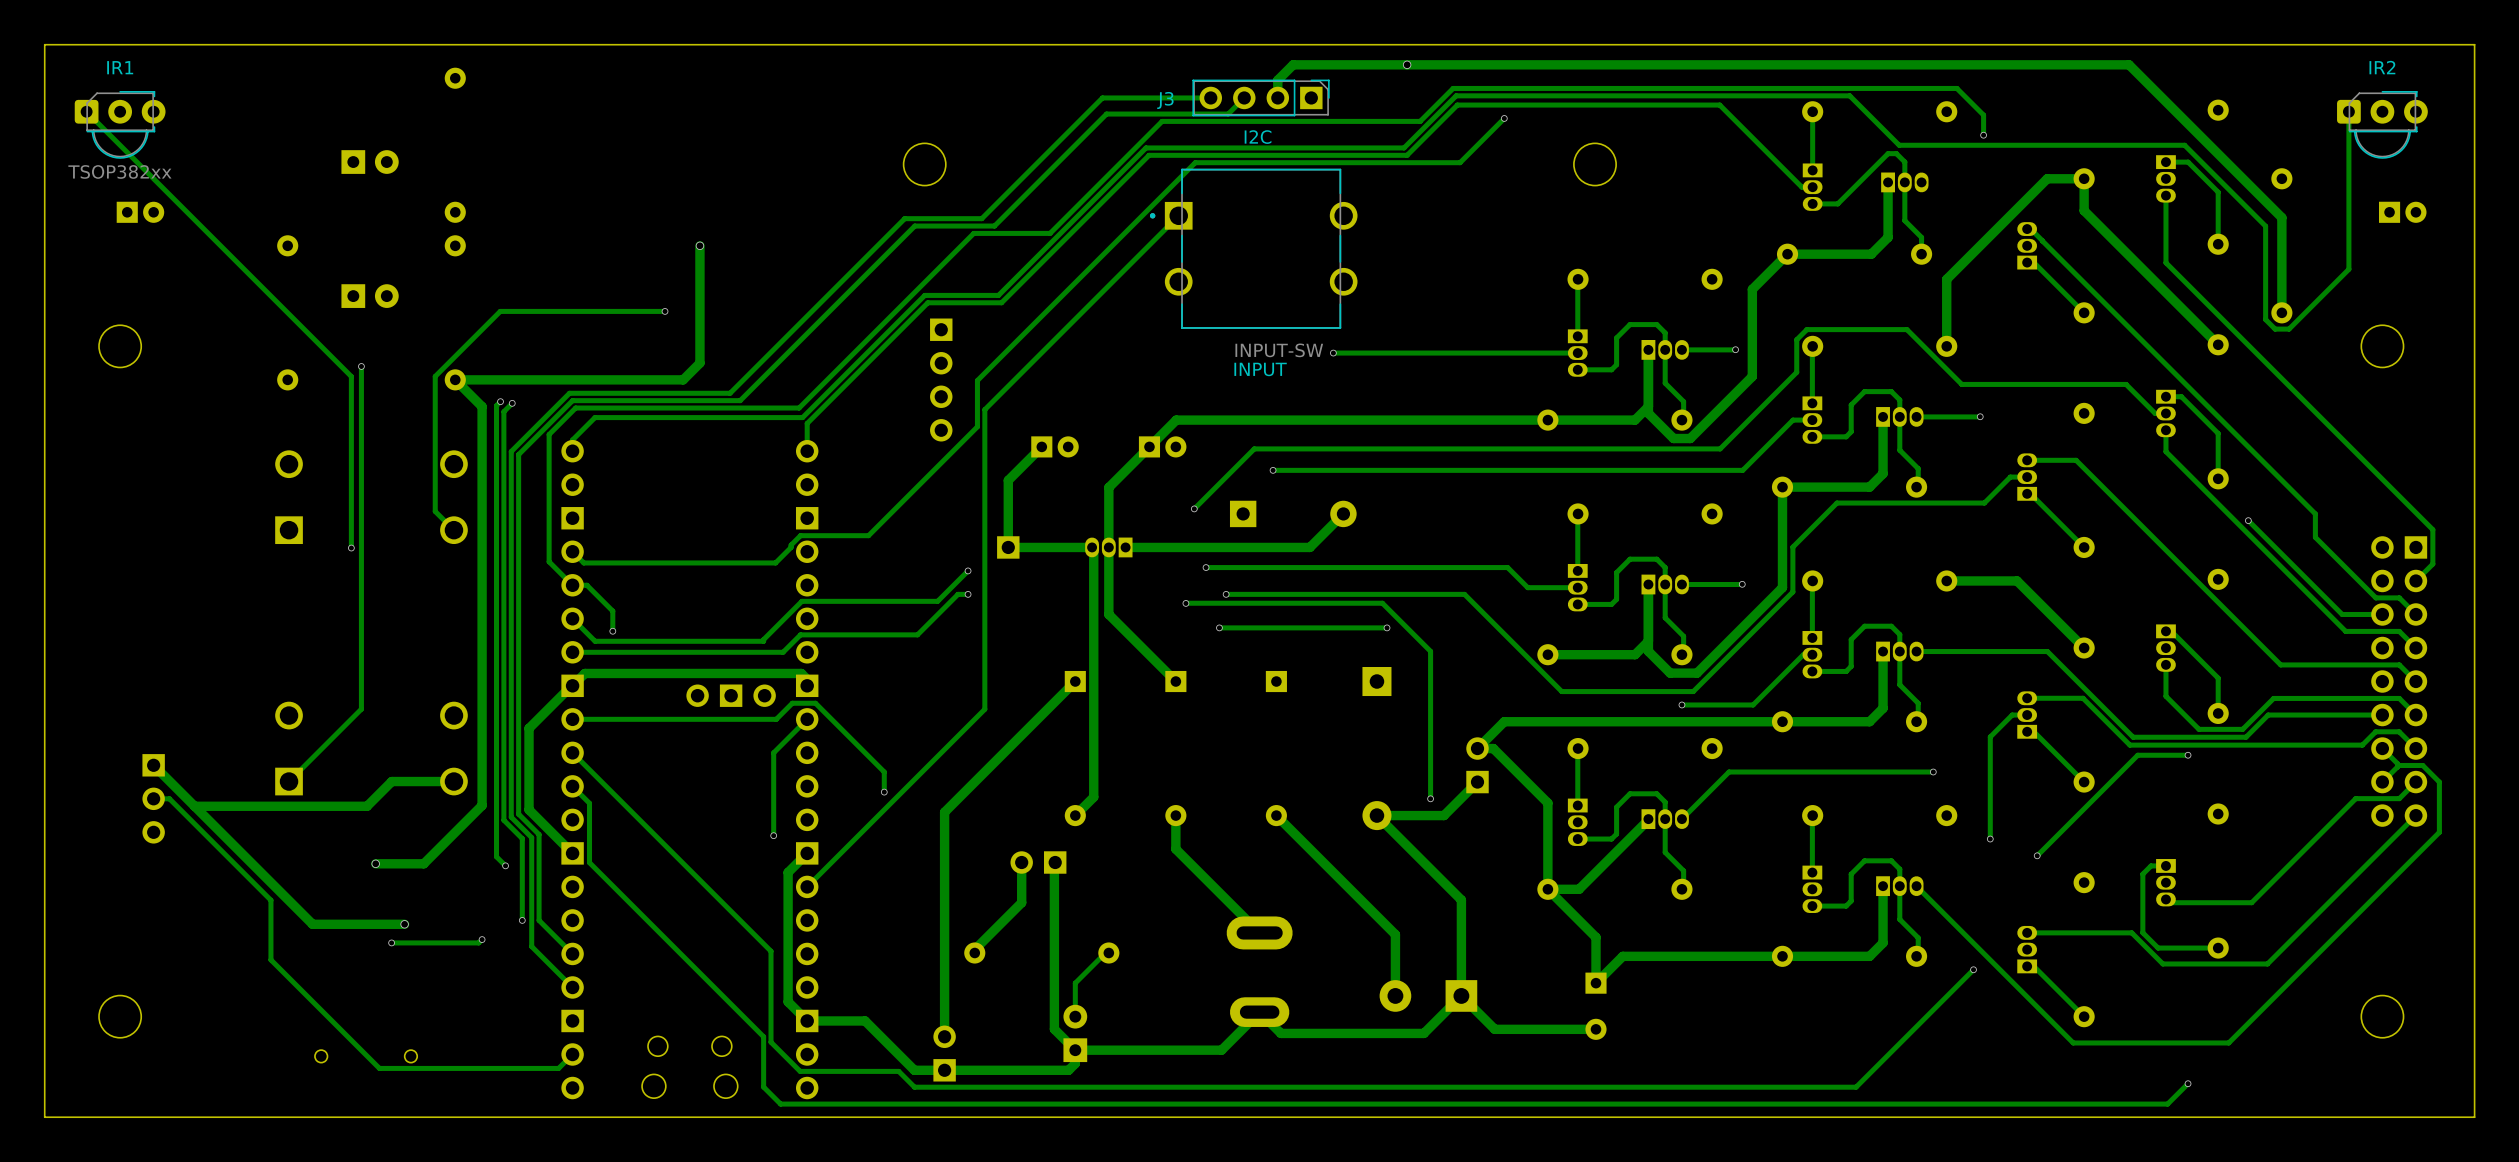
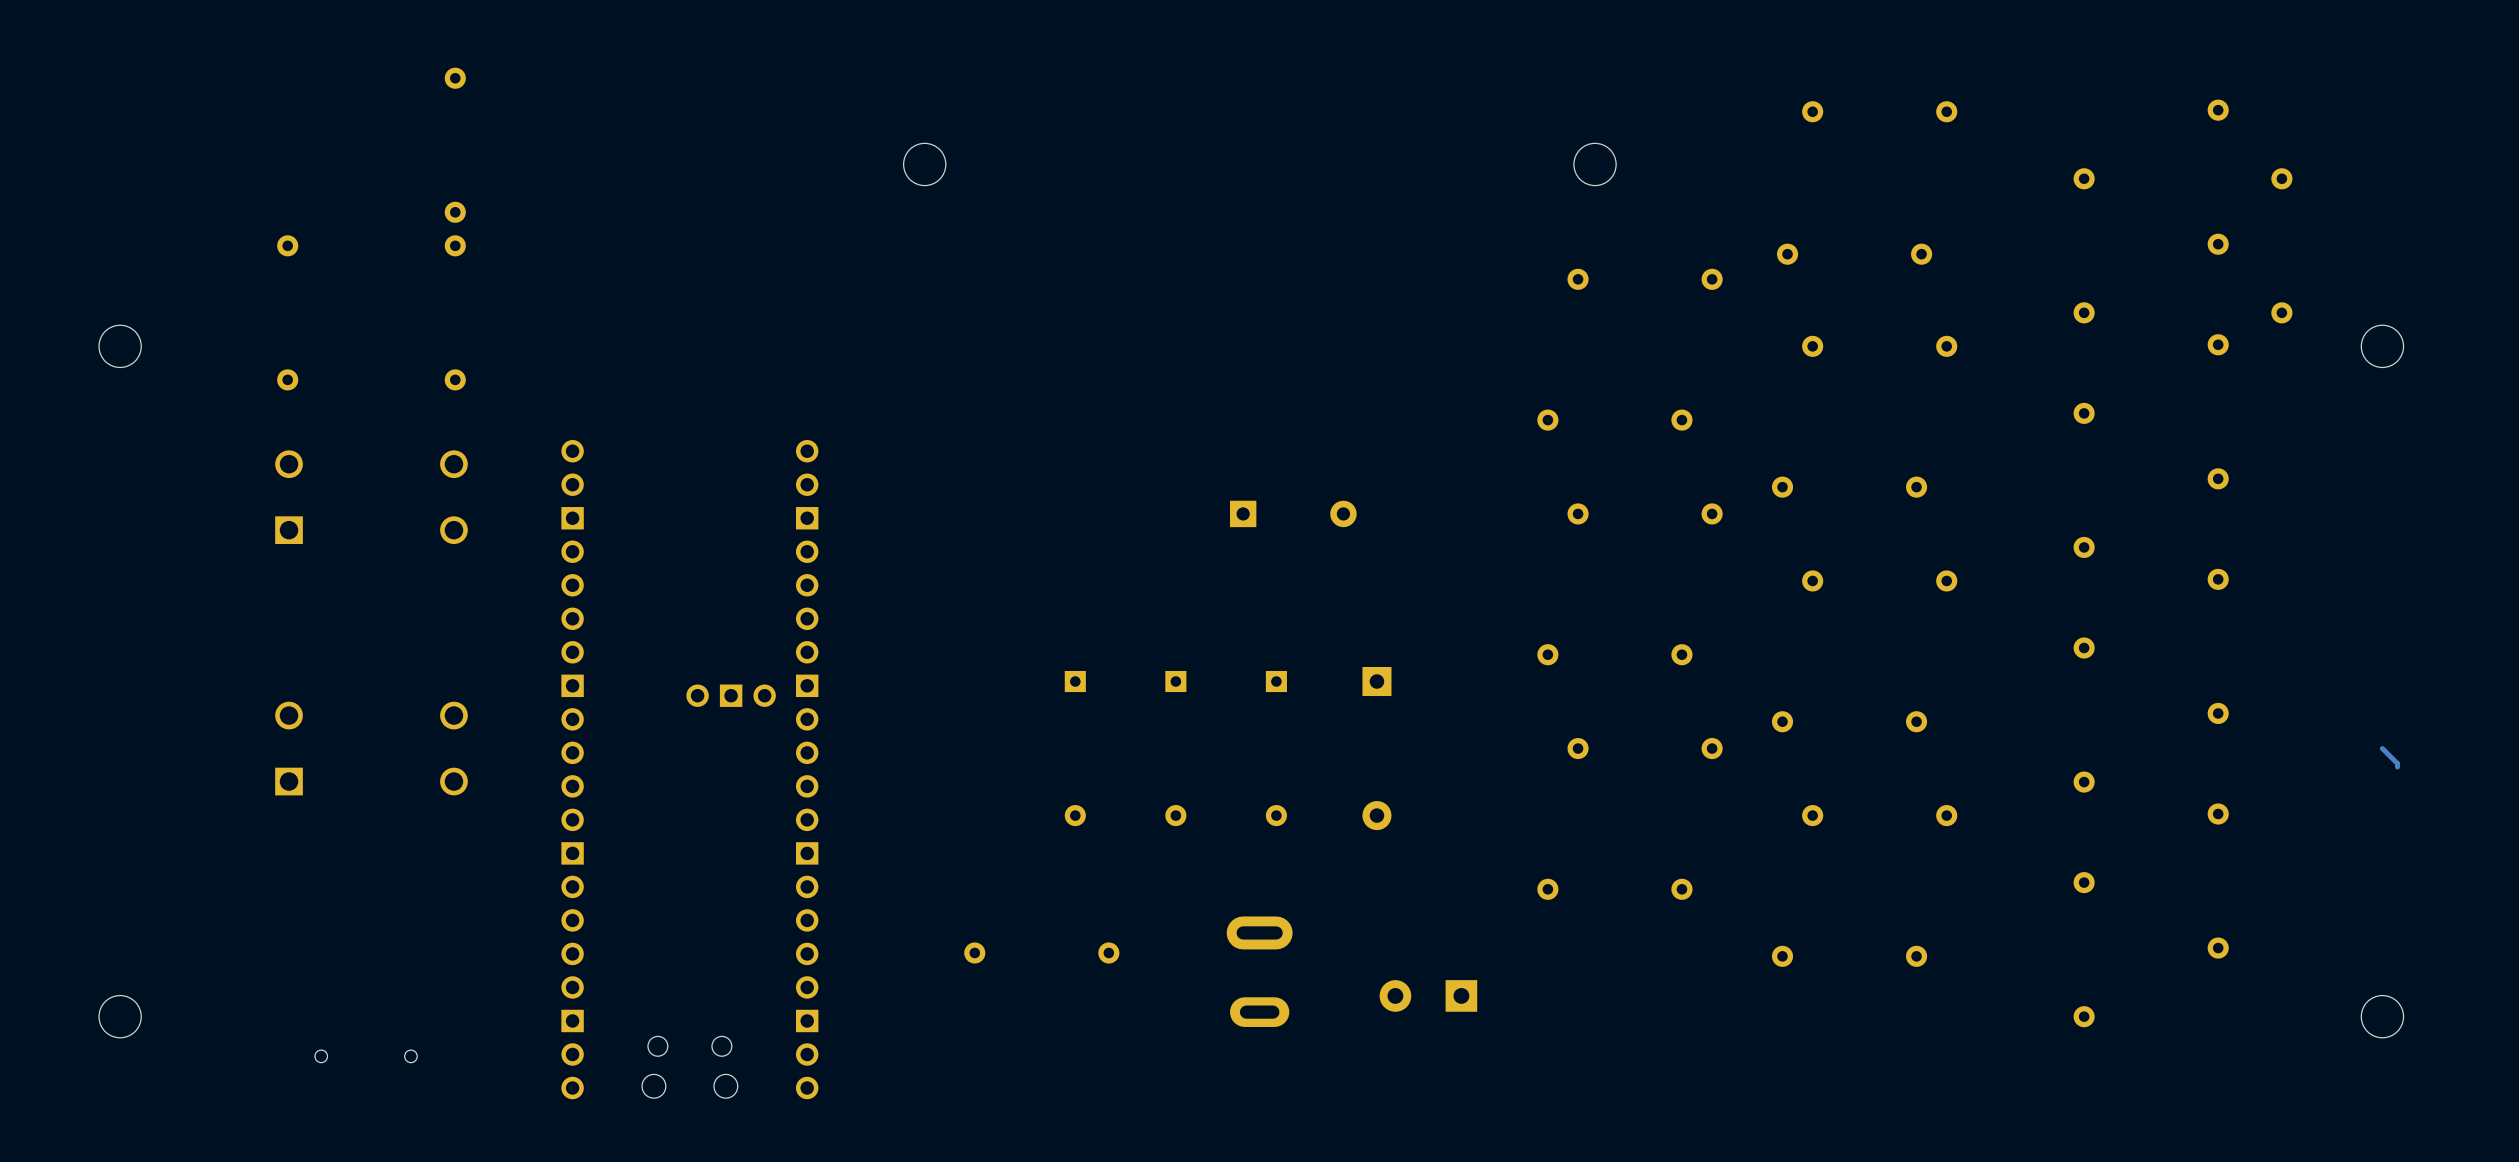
board edge: (2474, 44) (44, 44) (44, 1117) (2474, 1117) (2474, 44) -> none
via: (1407, 64) -> none
track: (1210, 97) (1102, 97) (981, 218) (904, 218) (730, 393) (569, 393) (511, 451) (511, 817) (531, 837) (531, 946) (572, 987) -> none
track: (1244, 97) (1228, 114) (1106, 114) (994, 226) (914, 226) (740, 400) (572, 400) (518, 454) (518, 814) (539, 834) (539, 920) (572, 953) -> none
J3: (1261, 97) -> none
track: (1277, 97) (1277, 80) (1293, 64) (2129, 64) (2281, 217) (2281, 312) -> none
track: (86, 111) (351, 376) (351, 548) -> none
track: (1812, 111) (1812, 170) -> none
track: (2348, 111) (2348, 269) (2289, 329) (2275, 329) (2265, 319) (2265, 226) (2184, 145) (1899, 145) (1849, 95) (1456, 95) (1404, 147) (1146, 147) (998, 295) (924, 295) (802, 417) (595, 417) (572, 440) (572, 451) -> none
track: (1504, 118) (1460, 162) (1195, 162) (977, 380) (977, 426) (868, 535) (800, 535) (775, 562) (583, 562) (572, 551) -> none
via: (1504, 118) -> none
IR1: TSOP382xx (120, 124) -> none
IR2: (2382, 124) -> none
track: (1983, 135) (1983, 115) (1956, 88) (1453, 88) (1420, 121) (1162, 121) (1050, 233) (973, 233) (799, 408) (575, 408) (549, 434) (549, 561) (572, 585) (586, 585) (612, 611) (612, 631) -> none
via: (1983, 135) -> none
text: I2C (1258, 137) -> none
part: (370, 162) -> none
track: (2165, 162) (2188, 162) (2218, 192) (2218, 244) -> none
part: (2165, 178) -> none
track: (1888, 182) (1888, 237) (1871, 254) (1787, 254) (1752, 289) (1752, 376) (1690, 438) (1673, 438) (1648, 413) (1648, 349) -> none
part: (1904, 182) -> none
track: (1812, 187) (1801, 187) (1719, 105) (1457, 105) (1407, 155) (1149, 155) (1001, 302) (927, 302) (807, 423) (807, 451) -> none
part: (1812, 187) -> none
track: (2165, 195) (2165, 262) (2432, 529) (2432, 564) (2415, 580) -> none
track: (1812, 203) (1837, 203) (1888, 153) (1896, 153) (1904, 162) (1904, 220) (1921, 237) (1921, 254) -> none
part: (140, 212) -> none
part: (2402, 212) -> none
track: (1178, 215) (984, 409) (984, 709) (807, 886) -> none
track: (2030, 229) (2042, 240) -> none
track: (2042, 240) (2315, 513) (2315, 537) (2375, 597) (2399, 597) (2415, 614) -> none
track: (699, 245) (699, 363) (683, 379) (455, 379) (482, 406) (482, 805) (423, 863) (375, 863) -> none
via: (699, 245) -> none
part: (2027, 245) -> none
INPUT: INPUT-SW (1253, 248) -> none
track: (2033, 262) (2084, 312) -> none
track: (1577, 279) (1577, 336) -> none
part: (370, 296) -> none
track: (665, 311) (500, 311) (435, 376) (435, 511) (453, 530) -> none
via: (665, 311) -> none
track: (2218, 344) (2084, 210) (2084, 178) (2047, 178) (1946, 279) (1946, 346) -> none
track: (1812, 346) (1812, 403) -> none
part: (1665, 349) -> none
track: (1735, 349) (1681, 349) -> none
via: (1735, 349) -> none
via: (1333, 353) -> none
track: (1577, 353) (1333, 353) -> none
part: (1577, 353) -> none
track: (361, 366) (361, 709) (289, 781) -> none
via: (361, 366) -> none
track: (1577, 369) (1611, 369) (1616, 364) (1616, 337) (1630, 324) (1656, 324) (1665, 332) (1665, 383) (1683, 401) (1683, 418) -> none
part: (941, 380) -> none
track: (2165, 396) (2181, 396) (2218, 433) (2218, 478) -> none
track: (500, 401) (496, 405) (496, 856) (505, 865) -> none
via: (500, 401) -> none
track: (512, 403) (503, 411) (503, 820) (522, 838) (522, 920) -> none
via: (512, 403) -> none
track: (1648, 406) (1635, 420) (1176, 420) (1108, 487) (1108, 614) (1175, 681) -> none
track: (2165, 413) (2155, 413) (2126, 384) (1961, 384) (1906, 329) (1806, 329) (1796, 339) (1796, 372) (1720, 448) (1254, 448) (1194, 508) -> none
part: (2165, 413) -> none
track: (1883, 416) (1883, 473) (1869, 487) (1782, 487) (1782, 587) (1697, 673) (1670, 673) (1648, 651) (1648, 584) -> none
part: (1899, 416) -> none
track: (1980, 416) (1916, 416) -> none
via: (1980, 416) -> none
track: (1812, 420) (1793, 420) (1742, 470) (1273, 470) -> none
part: (1812, 420) -> none
track: (2165, 430) (2165, 451) (2345, 631) (2399, 631) (2415, 648) -> none
track: (1812, 436) (1846, 436) (1851, 431) (1851, 405) (1864, 391) (1891, 391) (1899, 399) (1899, 450) (1918, 468) (1918, 485) -> none
track: (1041, 446) (1008, 480) (1008, 547) (1092, 547) -> none
part: (1055, 446) -> none
part: (1162, 446) -> none
track: (2027, 460) (2076, 460) (2280, 664) (2399, 664) (2415, 681) -> none
via: (1273, 470) -> none
track: (2027, 477) (2010, 477) (1984, 503) (1836, 503) (1792, 547) (1792, 591) (1693, 691) (1561, 691) (1464, 594) (1226, 594) -> none
part: (2027, 477) -> none
track: (2030, 493) (2084, 547) -> none
via: (1194, 508) -> none
track: (1343, 513) (1309, 547) (1125, 547) -> none
track: (1577, 514) (1577, 570) -> none
track: (2248, 520) (2342, 614) (2382, 614) -> none
via: (2248, 520) -> none
part: (1008, 547) -> none
part: (1108, 547) -> none
via: (351, 548) -> none
track: (1093, 549) (1093, 797) (1075, 815) -> none
track: (1206, 567) (1507, 567) (1527, 587) (1577, 587) -> none
via: (1206, 567) -> none
track: (968, 570) (937, 601) (801, 601) (763, 641) (595, 641) (572, 618) -> none
via: (968, 570) -> none
track: (1946, 580) (2017, 580) (2084, 648) -> none
track: (1812, 581) (1812, 637) -> none
part: (1665, 584) -> none
track: (1742, 584) (1681, 584) -> none
via: (1742, 584) -> none
part: (1577, 587) -> none
track: (968, 594) (958, 594) (917, 634) (800, 634) (783, 652) (572, 652) -> none
via: (968, 594) -> none
via: (1226, 594) -> none
track: (1185, 603) (1382, 603) (1430, 651) (1430, 798) -> none
via: (1185, 603) -> none
track: (1577, 604) (1611, 604) (1616, 599) (1616, 572) (1630, 559) (1656, 559) (1665, 567) (1665, 617) (1683, 636) (1683, 653) -> none
via: (1219, 627) -> none
track: (1387, 627) (1219, 627) -> none
via: (1387, 627) -> none
via: (612, 631) -> none
track: (2171, 631) (2218, 678) (2218, 713) -> none
track: (1648, 641) (1635, 654) (1547, 654) -> none
part: (2165, 648) -> none
track: (1883, 651) (1883, 708) (1869, 721) (1504, 721) (1477, 748) (1493, 748) (1547, 803) (1547, 889) -> none
part: (1899, 651) -> none
track: (1916, 651) (2047, 651) (2133, 737) (2245, 737) (2268, 715) (2382, 715) -> none
track: (1812, 654) (1803, 654) (1753, 704) (1681, 704) -> none
part: (1812, 654) -> none
track: (2165, 664) (2165, 696) (2199, 729) (2242, 729) (2273, 698) (2399, 698) (2415, 715) -> none
track: (1812, 671) (1846, 671) (1851, 666) (1851, 639) (1864, 626) (1891, 626) (1899, 634) (1899, 684) (1918, 703) (1918, 720) -> none
track: (807, 679) (801, 673) (584, 673) (572, 685) -> none
track: (1075, 681) (944, 812) (944, 1036) -> none
part: (2399, 681) -> none
track: (571, 685) (529, 728) (529, 809) (572, 853) -> none
track: (2027, 698) (2083, 698) (2129, 745) (2362, 745) (2375, 731) (2399, 731) (2415, 748) -> none
via: (1681, 704) -> none
track: (2027, 715) (2012, 715) (1990, 736) (1990, 839) -> none
part: (2027, 715) -> none
track: (572, 719) (776, 719) (792, 703) (815, 703) (884, 772) (884, 792) -> none
track: (807, 719) (773, 752) (773, 835) -> none
track: (2033, 731) (2084, 782) -> none
track: (1577, 748) (1577, 805) -> none
track: (572, 752) (771, 951) (771, 1042) (800, 1071) (898, 1071) (914, 1087) (1856, 1087) (1973, 969) -> none
track: (2188, 755) (2137, 755) (2037, 855) -> none
via: (2188, 755) -> none
track: (153, 765) (312, 924) (404, 924) -> none
part: (1477, 765) -> none
track: (1933, 772) (1729, 772) (1681, 819) -> none
via: (1933, 772) -> none
track: (453, 781) (391, 781) (367, 806) (194, 806) -> none
track: (1477, 782) (1443, 815) (1376, 815) (1461, 900) (1461, 995) -> none
track: (2382, 782) (2399, 765) (2422, 765) (2439, 782) (2439, 832) (2228, 1042) (2073, 1042) (1916, 886) -> none
track: (2415, 782) (2399, 798) (2355, 798) (2251, 902) (2169, 902) -> none
track: (572, 786) (589, 803) (589, 862) (763, 1036) (763, 1087) (780, 1104) (2167, 1104) (2188, 1083) -> none
via: (884, 792) -> none
track: (153, 798) (169, 798) (270, 900) (270, 959) (379, 1068) (558, 1068) (572, 1054) -> none
part: (153, 798) -> none
via: (1430, 798) -> none
track: (1175, 815) (1175, 849) (1259, 932) -> none
track: (1276, 815) (1395, 934) (1395, 995) -> none
track: (1812, 815) (1812, 872) -> none
track: (2415, 815) (2267, 963) (2162, 963) (2131, 932) (2027, 932) -> none
track: (1648, 819) (1579, 889) (1547, 889) -> none
part: (1665, 819) -> none
part: (1577, 822) -> none
via: (773, 835) -> none
track: (1577, 839) (1611, 839) (1616, 834) (1616, 807) (1630, 793) (1656, 793) (1665, 802) (1665, 852) (1683, 870) (1683, 887) -> none
via: (1990, 839) -> none
track: (807, 853) (788, 872) (788, 1001) (807, 1020) (865, 1020) (914, 1070) (1068, 1070) (1075, 1063) (1075, 1050) -> none
via: (2037, 855) -> none
track: (1021, 862) (1021, 902) (974, 949) -> none
part: (1038, 862) -> none
via: (375, 863) -> none
track: (1054, 863) (1054, 1029) (1075, 1050) -> none
via: (505, 865) -> none
track: (2165, 865) (2151, 865) (2142, 874) (2142, 932) (2158, 948) (2218, 948) -> none
part: (2165, 882) -> none
track: (1883, 886) (1883, 942) (1869, 956) (1622, 956) (1596, 983) (1596, 937) (1547, 889) -> none
part: (1899, 886) -> none
part: (1812, 889) -> none
track: (1812, 906) (1846, 906) (1851, 901) (1851, 874) (1864, 860) (1891, 860) (1899, 869) (1899, 919) (1918, 937) (1918, 954) -> none
via: (522, 920) -> none
via: (404, 924) -> none
track: (482, 939) (478, 942) (391, 942) -> none
via: (482, 939) -> none
via: (391, 942) -> none
track: (1108, 949) (1075, 983) (1075, 1016) -> none
part: (2027, 949) -> none
track: (2033, 966) (2084, 1016) -> none
via: (1973, 969) -> none
track: (1461, 995) (1423, 1033) (1280, 1033) (1259, 1012) (1221, 1050) (1075, 1050) -> none
track: (1461, 995) (1494, 1029) (1596, 1029) -> none
part: (1596, 1006) -> none
part: (1075, 1033) -> none
part: (944, 1053) -> none
via: (2188, 1083) -> none

